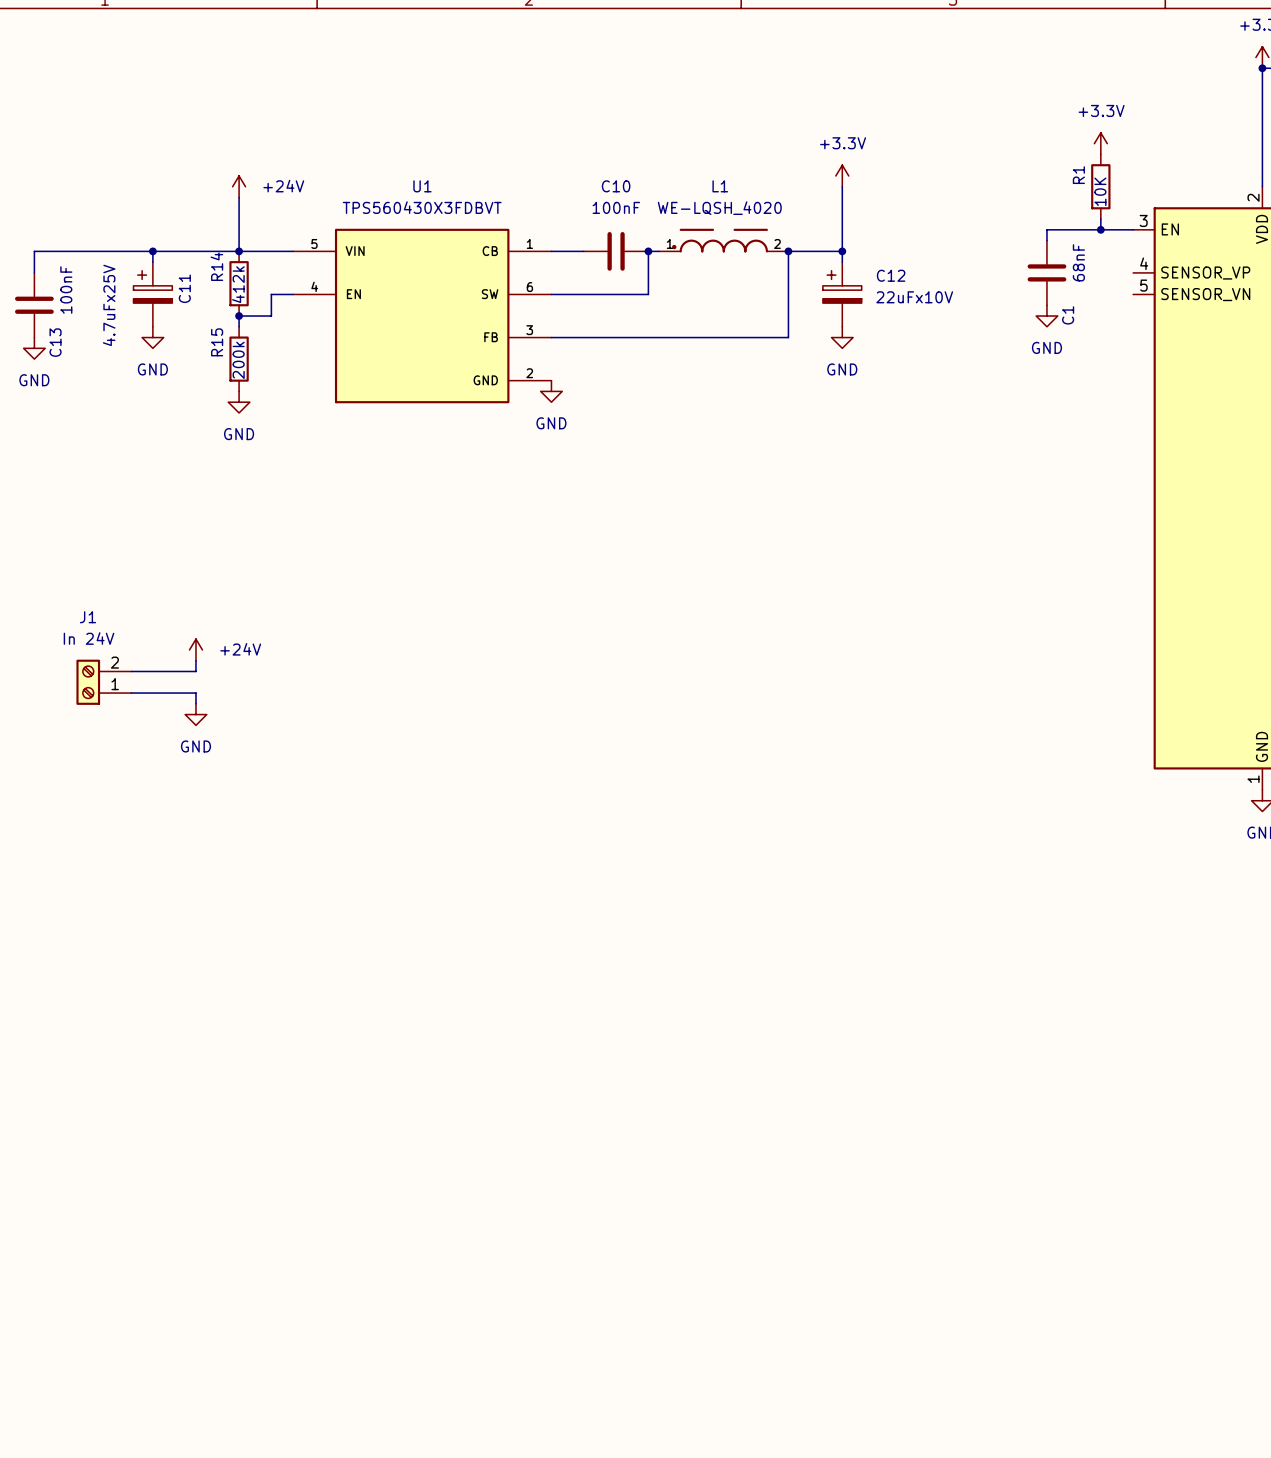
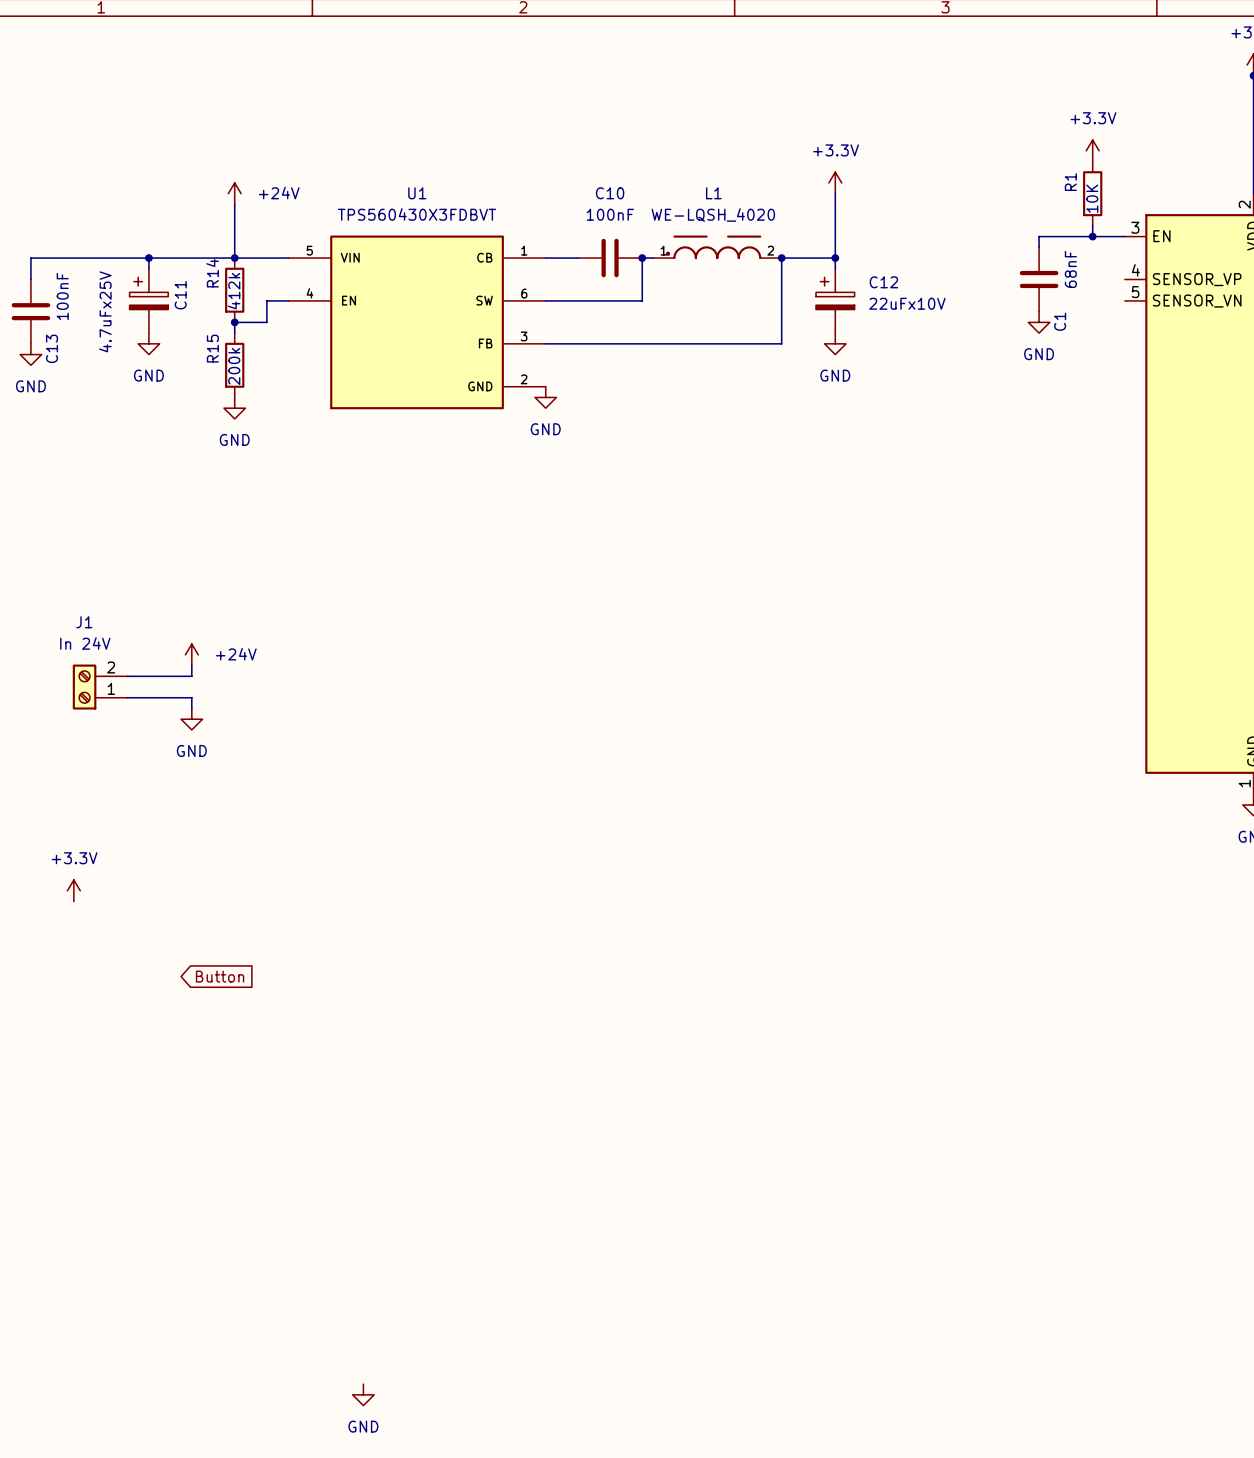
power symbol: none -> +3.3V (73, 890)
global label: none -> Button (220, 976)
power symbol: none -> GND (363, 1394)

